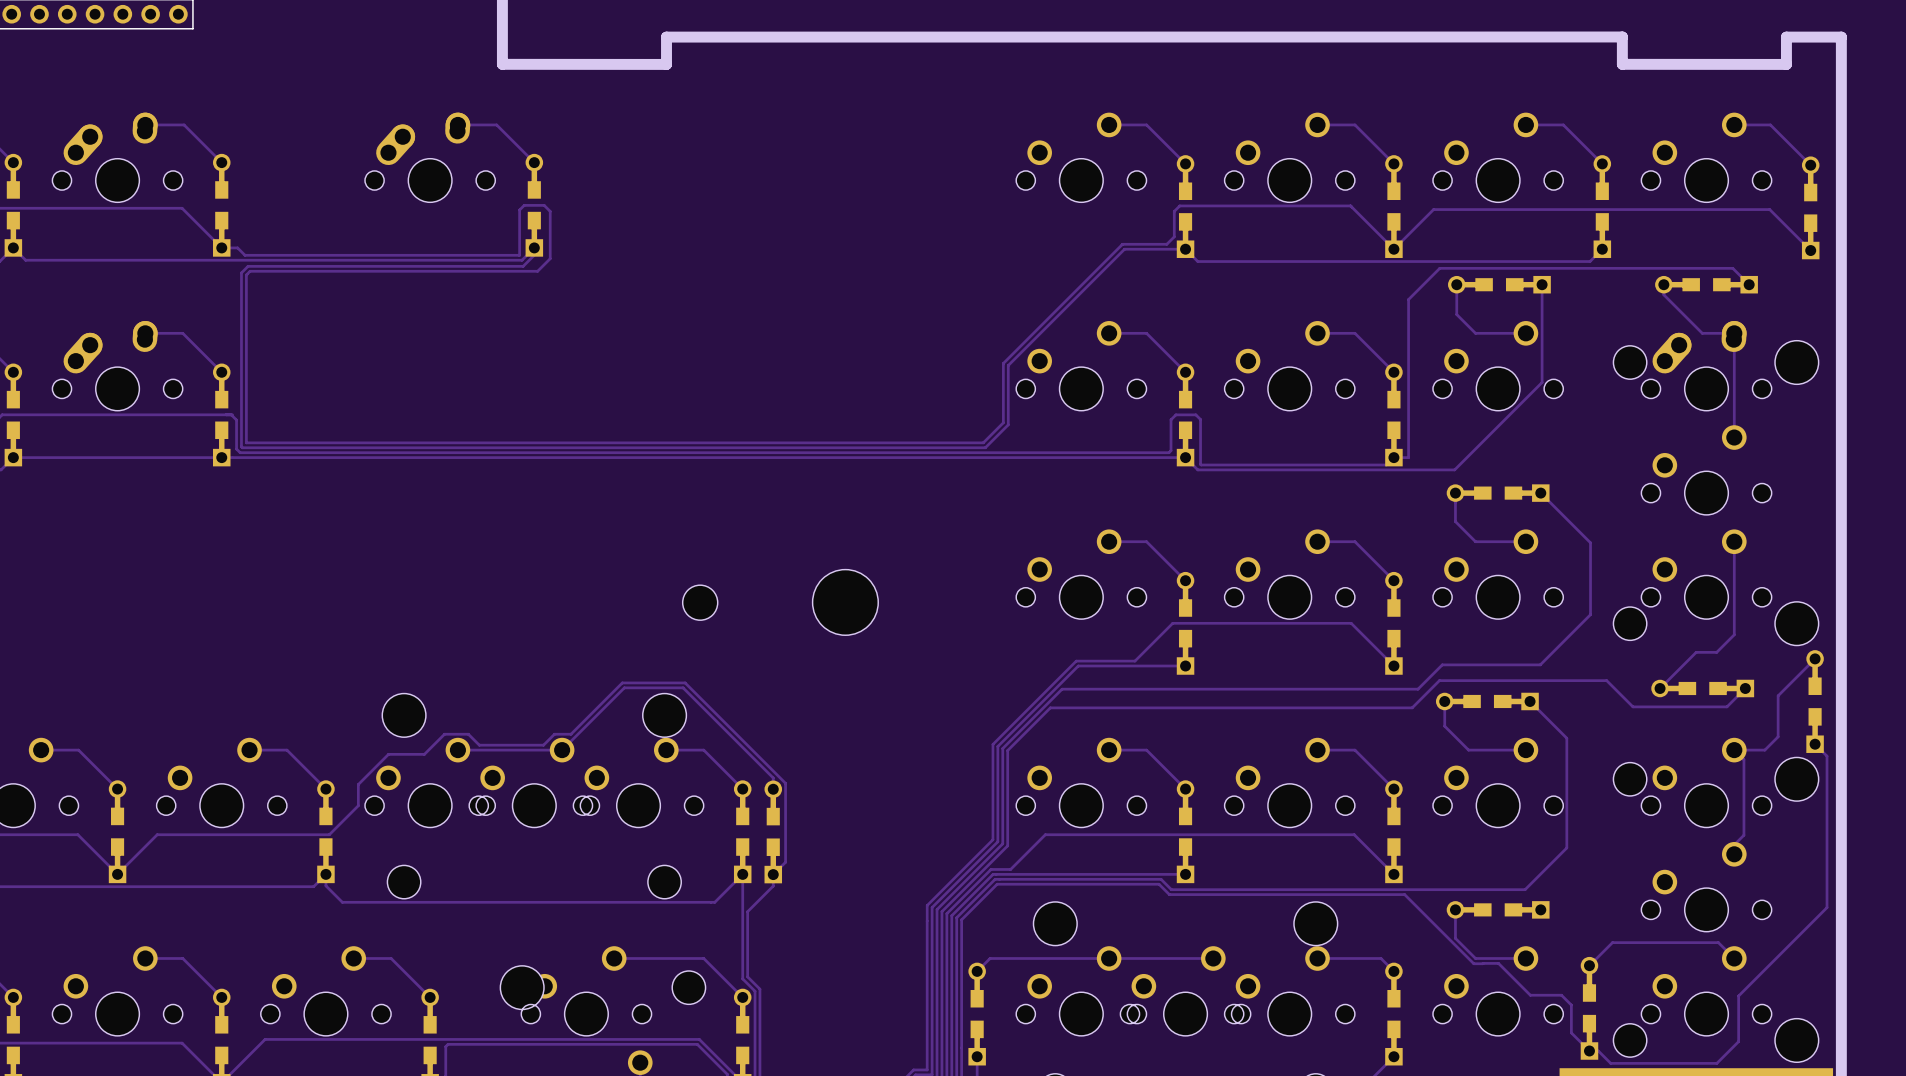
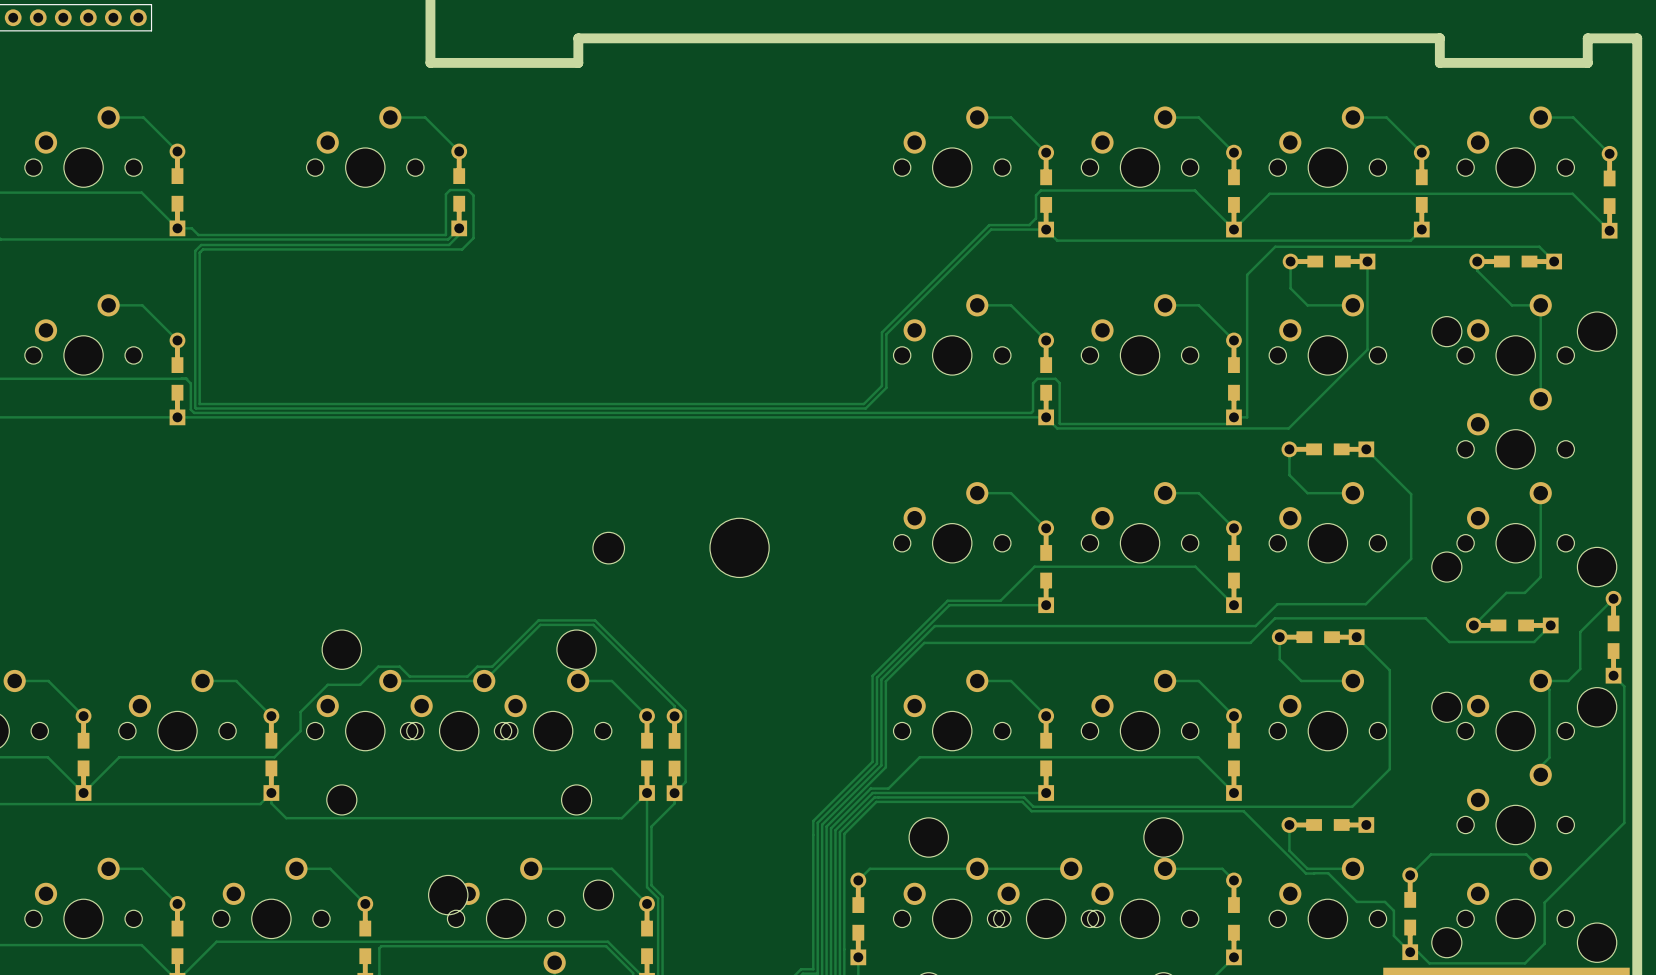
part footprint: [52, 112, 183, 203] -> [24, 106, 143, 188]
part footprint: [365, 112, 496, 203] -> [306, 106, 425, 188]
part footprint: [52, 321, 183, 411] -> [24, 294, 143, 376]
part footprint: [1641, 321, 1772, 411] -> [1456, 294, 1575, 376]

